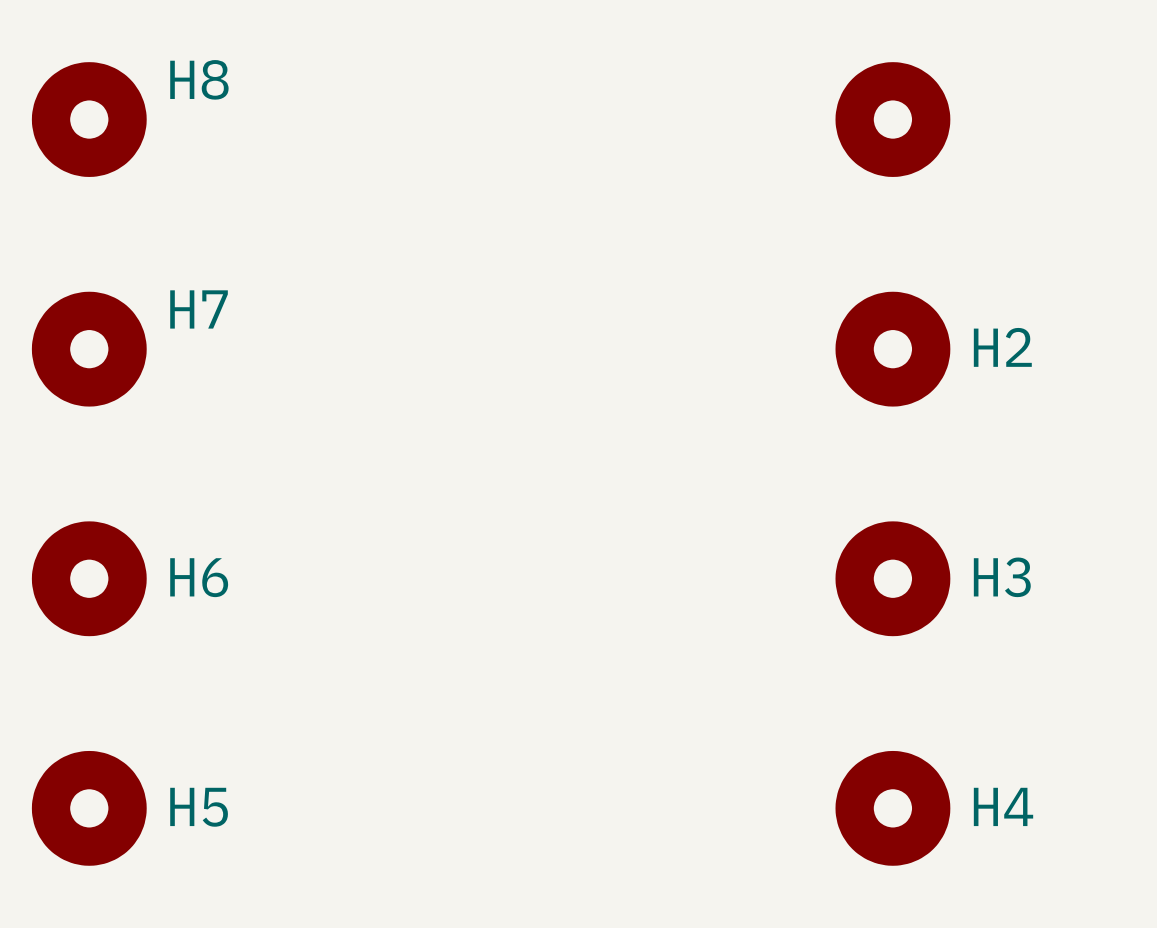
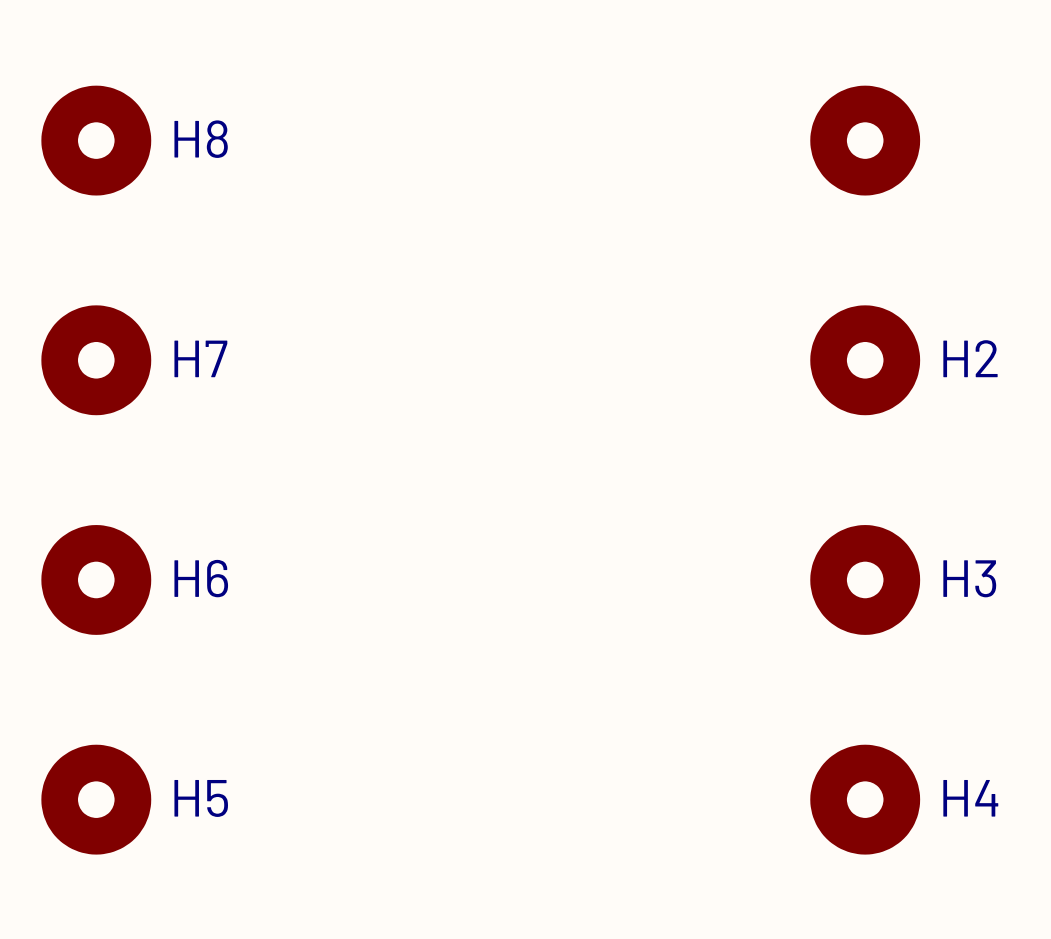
H8 name position: H8 (199, 79) -> H8 (201, 139)
H7 name position: H7 (199, 309) -> H7 (200, 358)

